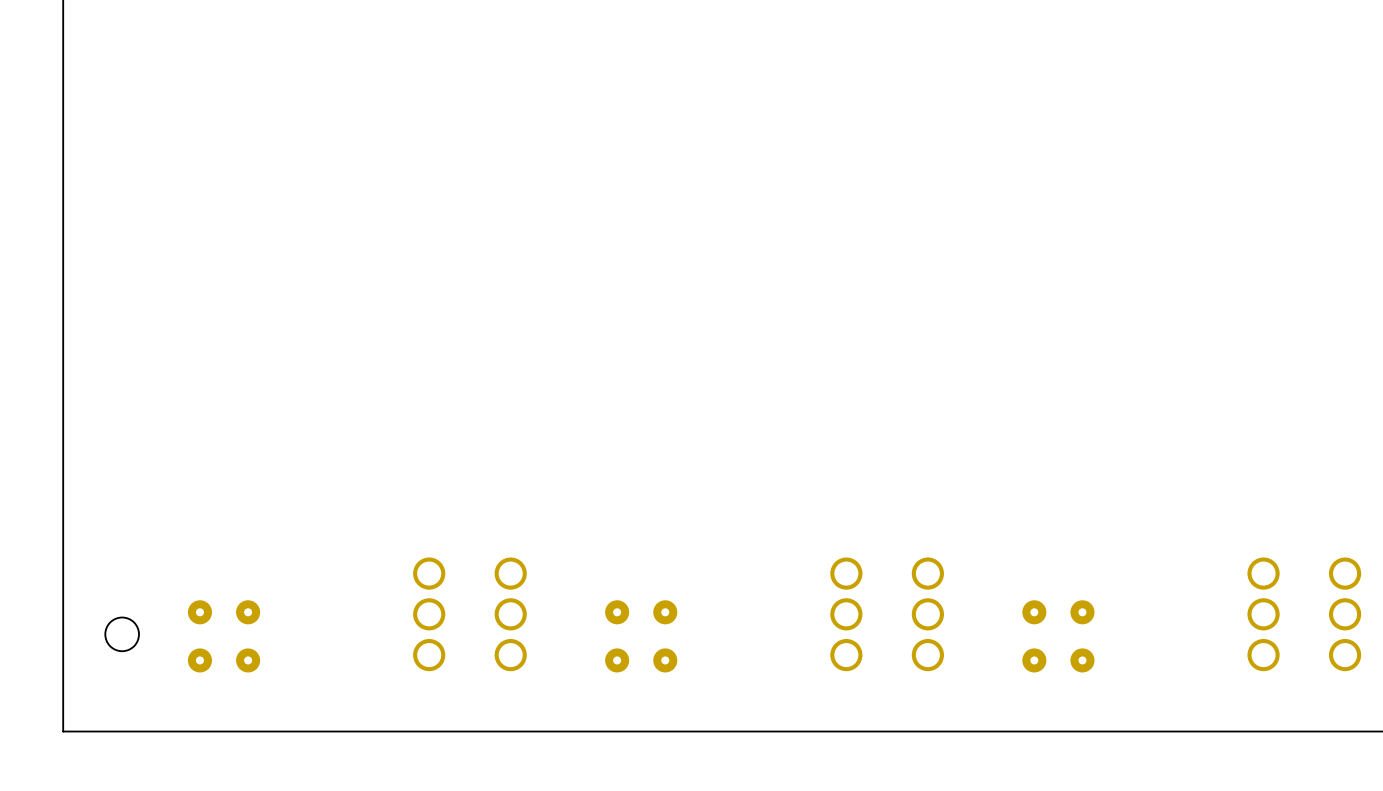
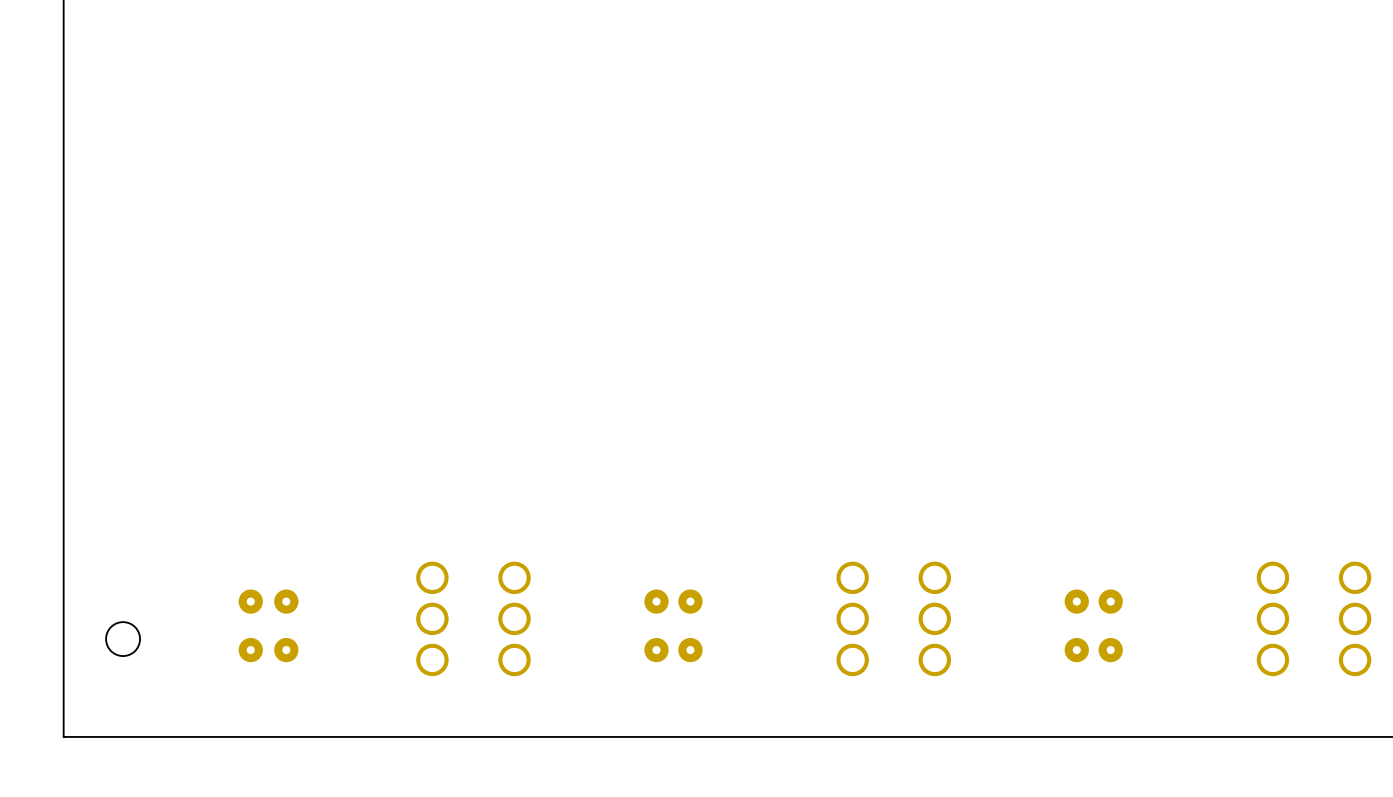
part: (224, 612) -> none
part rotation: 0° (641, 612) -> 90° clockwise (656, 625)
part rotation: 0° (1058, 612) -> 90° clockwise (1076, 625)
part: none -> (250, 625)
part: none -> (286, 625)
part: (224, 660) -> none
part rotation: 0° (641, 660) -> 90° clockwise (690, 625)
part position: (641, 660) -> (690, 625)
part rotation: 0° (1058, 660) -> 90° clockwise (1110, 625)
part position: (1058, 660) -> (1110, 625)

